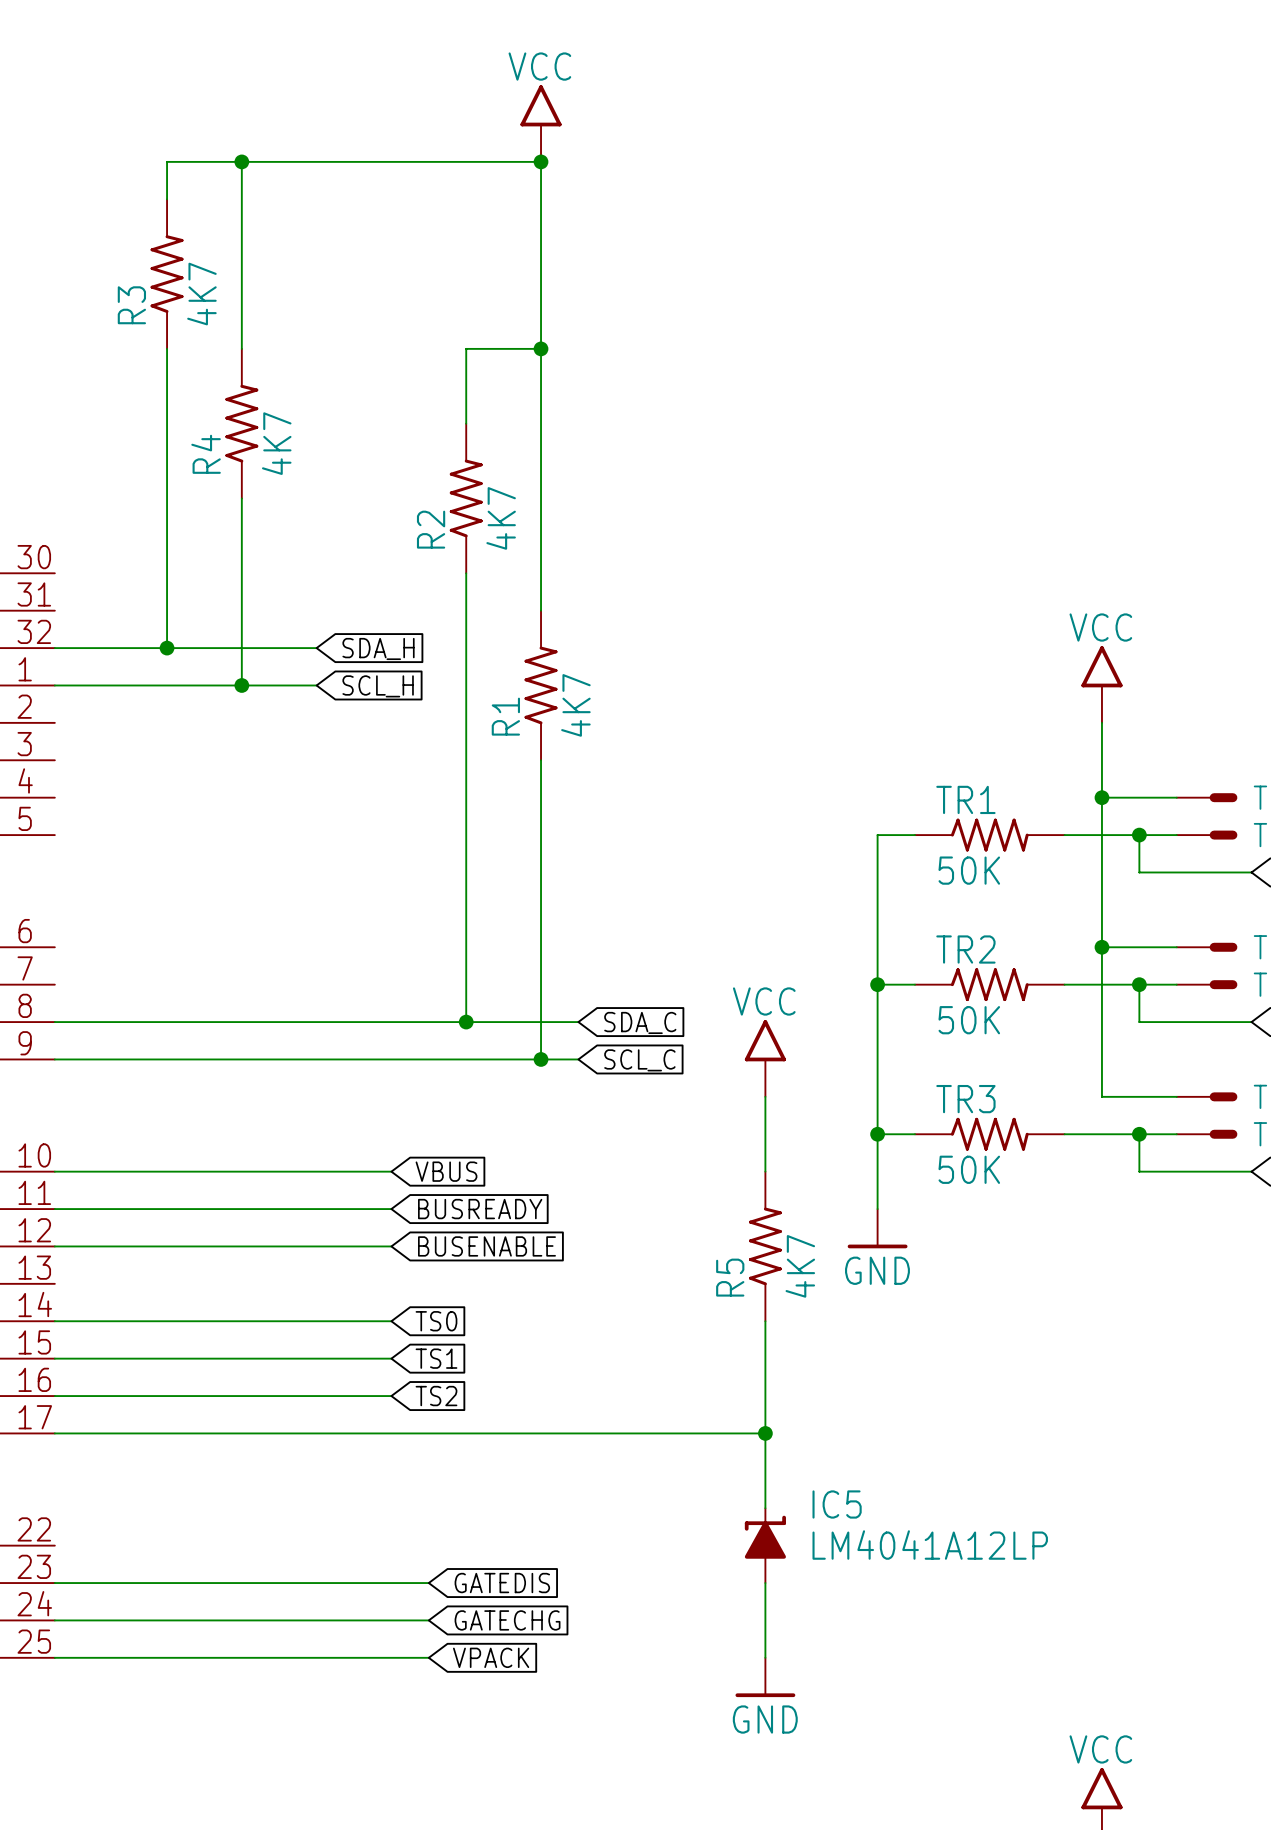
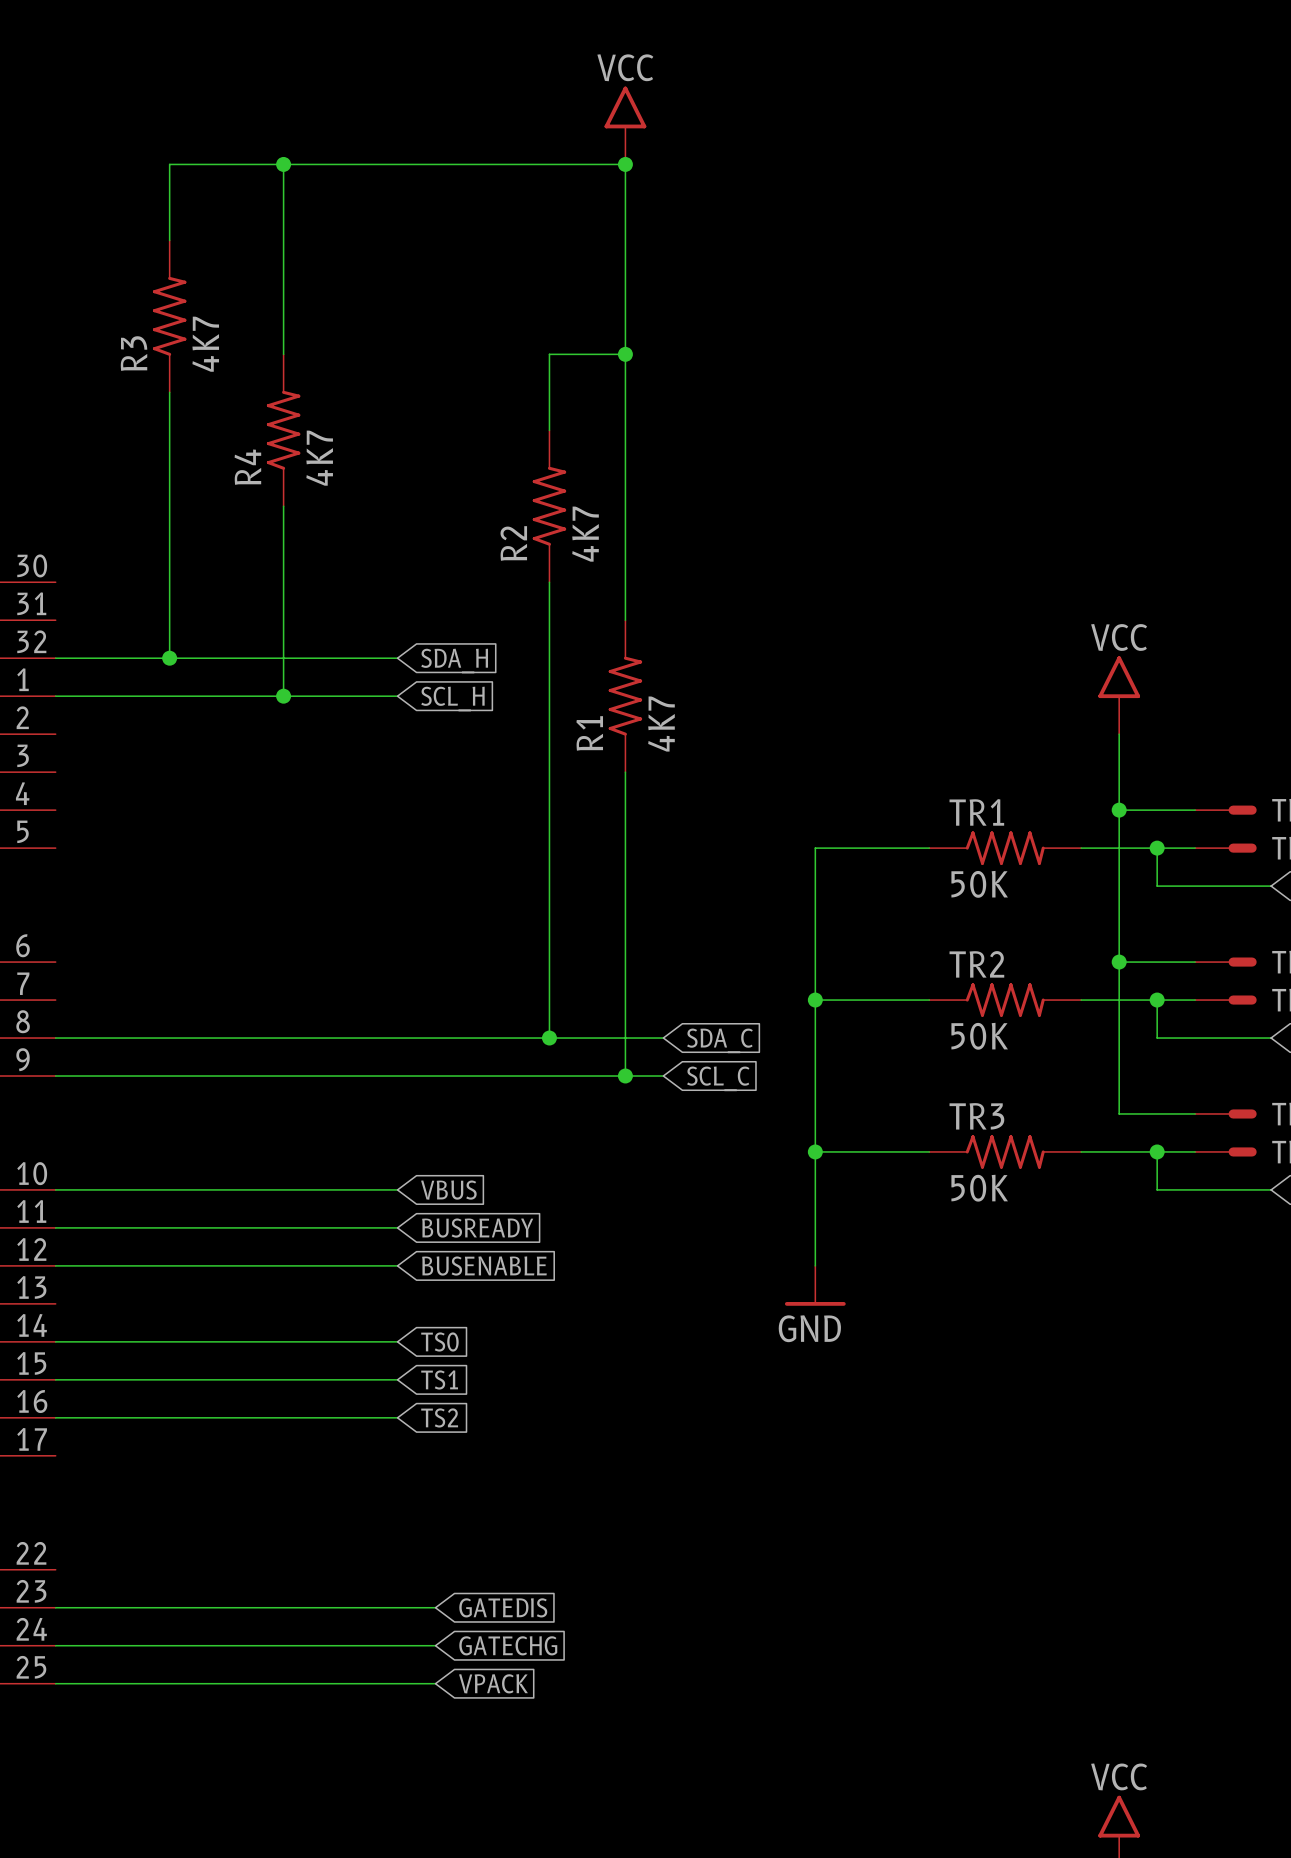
power symbol position: (541, 123) -> (625, 125)
wire: (241, 161) (241, 348) -> (283, 164) (283, 354)
junction position: (241, 161) -> (283, 164)
wire: (541, 161) (541, 348) (466, 348) (466, 423) -> (549, 164) (625, 164) (625, 620)
junction position: (541, 161) -> (625, 164)
R3 position: (167, 274) -> (169, 316)
wire: none -> (549, 354) (625, 354)
junction position: (541, 348) -> (625, 354)
R4 position: (241, 423) -> (283, 430)
wire: (241, 498) (241, 685) -> (283, 506) (283, 696)
R2 position: (466, 498) -> (549, 506)
wire: (466, 573) (466, 1022) -> none
wire: none -> (321, 658) (397, 658)
global label position: SDA_H (378, 648) -> SDA_H (454, 661)
junction position: (241, 685) -> (283, 696)
wire: none -> (321, 696) (397, 696)
R1 position: (541, 685) -> (625, 696)
global label position: SCL_H (378, 686) -> SCL_H (452, 699)
wire: none -> (625, 772) (625, 1076)
wire: (877, 835) (877, 1209) -> (891, 848) (815, 848) (815, 1265)
wire: none -> (815, 1000) (891, 1000)
junction position: (877, 984) -> (815, 1000)
junction: (466, 1022) -> none
wire: (541, 1022) (541, 1059) -> none
junction: none -> (549, 1038)
wire: none -> (587, 1038) (663, 1038)
global label position: SDA_C (640, 1022) -> SDA_C (719, 1040)
power symbol: (765, 1058) -> none
junction: (541, 1059) -> none
wire: none -> (587, 1076) (663, 1076)
junction: none -> (625, 1076)
global label position: SCL_C (639, 1060) -> SCL_C (718, 1078)
wire: (765, 1096) (765, 1171) -> none
wire: none -> (815, 1151) (891, 1151)
junction position: (877, 1134) -> (815, 1151)
power symbol position: GND (877, 1228) -> GND (815, 1285)
R5: 4K7 (765, 1246) -> none
wire: (765, 1321) (765, 1508) -> none
wire: (54, 1433) (765, 1433) -> none
junction: (765, 1433) -> none
IC5: LM4041A12LP (765, 1545) -> none
wire: (765, 1583) (765, 1657) -> none
power symbol: GND (765, 1677) -> none

